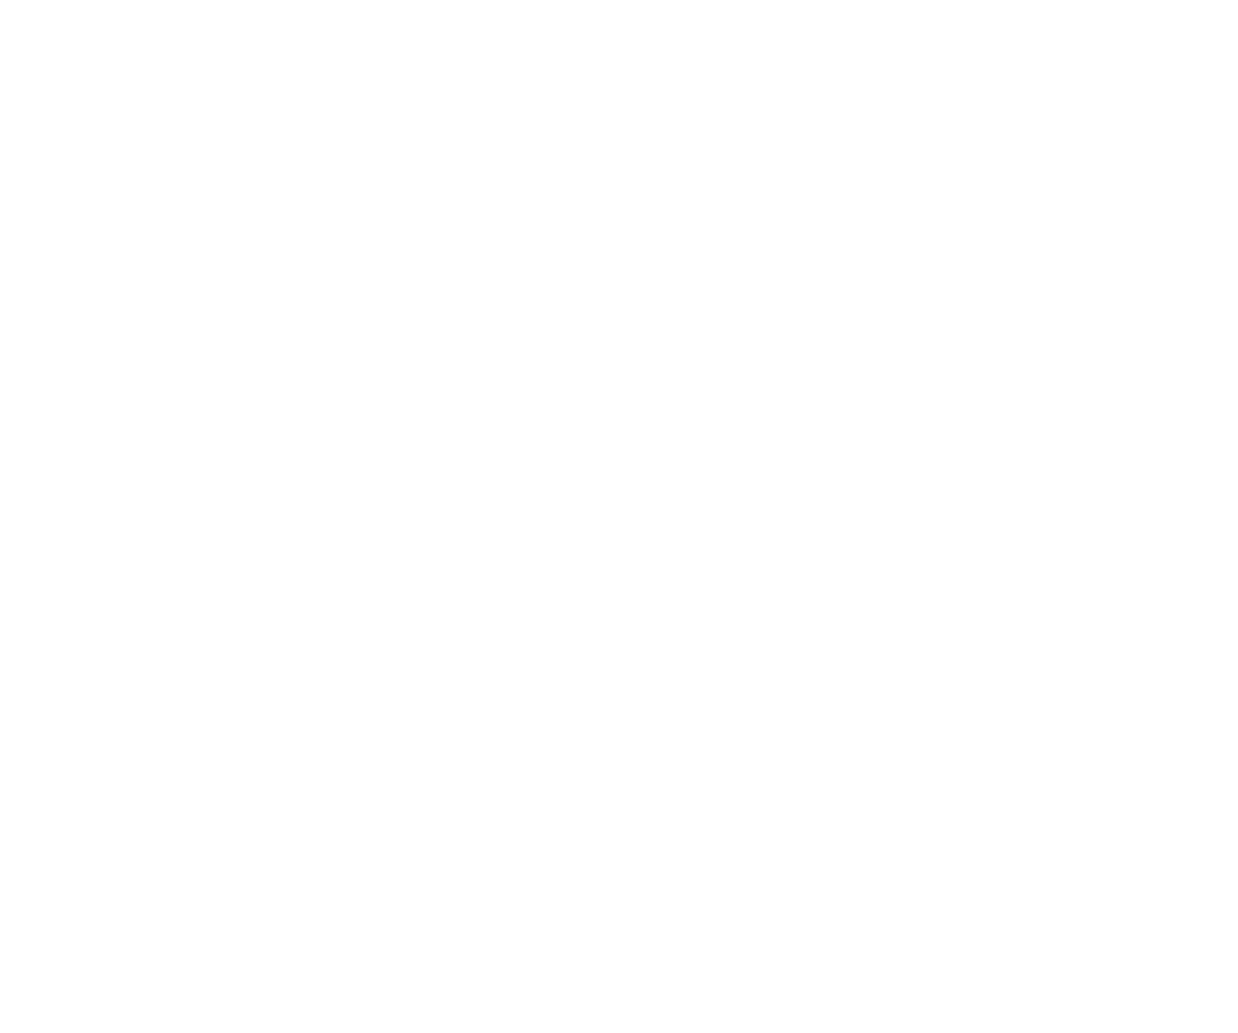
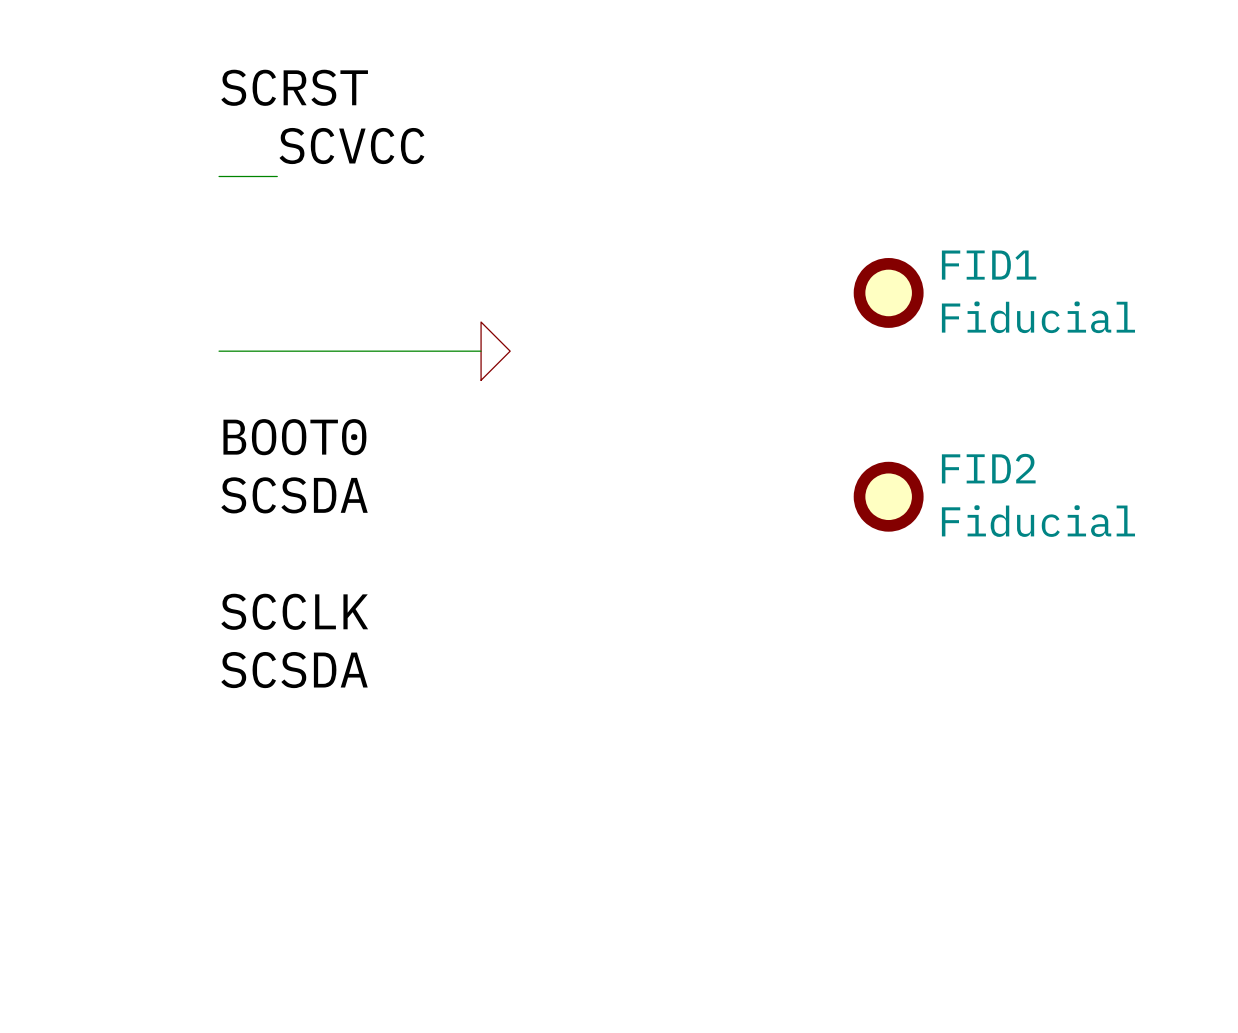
label: none -> SCRST (294, 87)
label: none -> SCVCC (351, 146)
wire: none -> (219, 176) (277, 176)
FID1: none -> Fiducial (888, 292)
wire: none -> (219, 351) (481, 351)
power symbol: none -> (495, 351)
label: none -> BOOT0 (294, 437)
label: none -> SCSDA (294, 495)
FID2: none -> Fiducial (888, 496)
label: none -> SCCLK (294, 611)
label: none -> SCSDA (294, 670)

